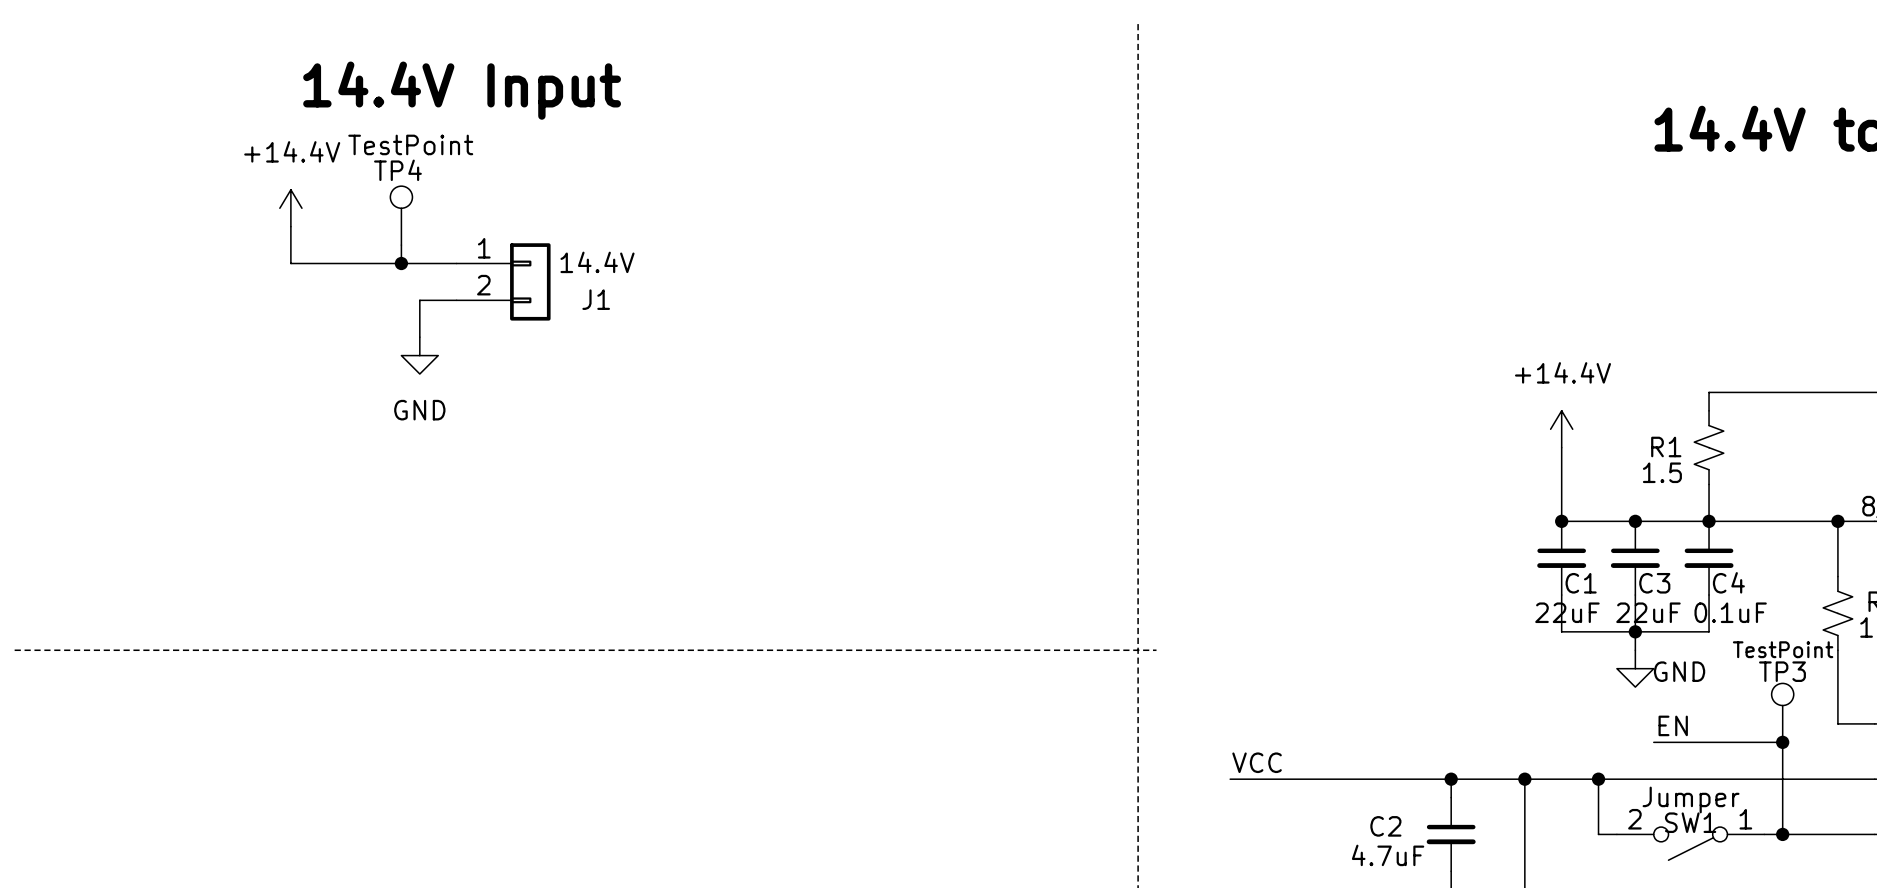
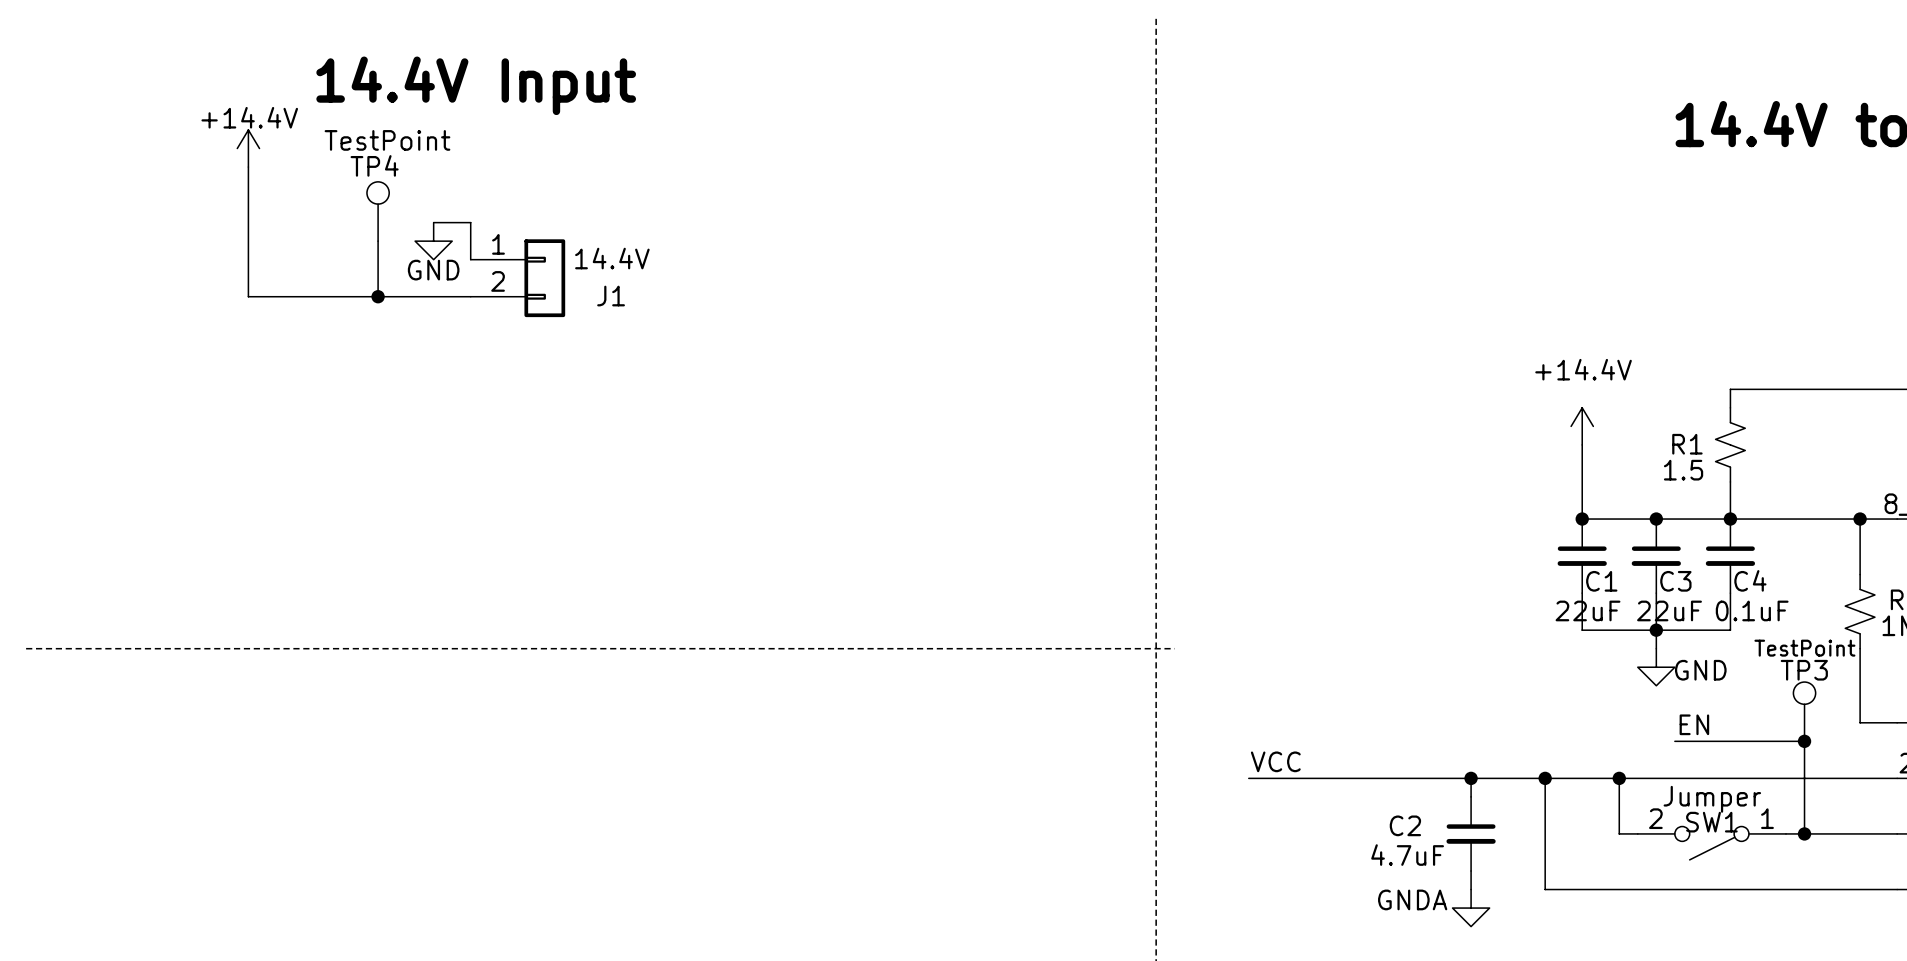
power symbol text position: +14.4V (292, 151) -> +14.4V (249, 117)
power symbol position: +14.4V (290, 208) -> +14.4V (248, 148)
TP4 position: (401, 215) -> (378, 211)
wire: (290, 226) (290, 263) (456, 263) -> (433, 222) (470, 222) (470, 259)
wire: none -> (378, 241) (378, 296)
wire: (401, 245) (401, 263) -> none
junction position: (401, 263) -> (378, 296)
wire: (419, 300) (419, 337) -> (433, 296) (248, 296) (248, 167)
power symbol position: GND (419, 355) -> GND (433, 241)
power symbol text position: GND (419, 410) -> GND (433, 270)

